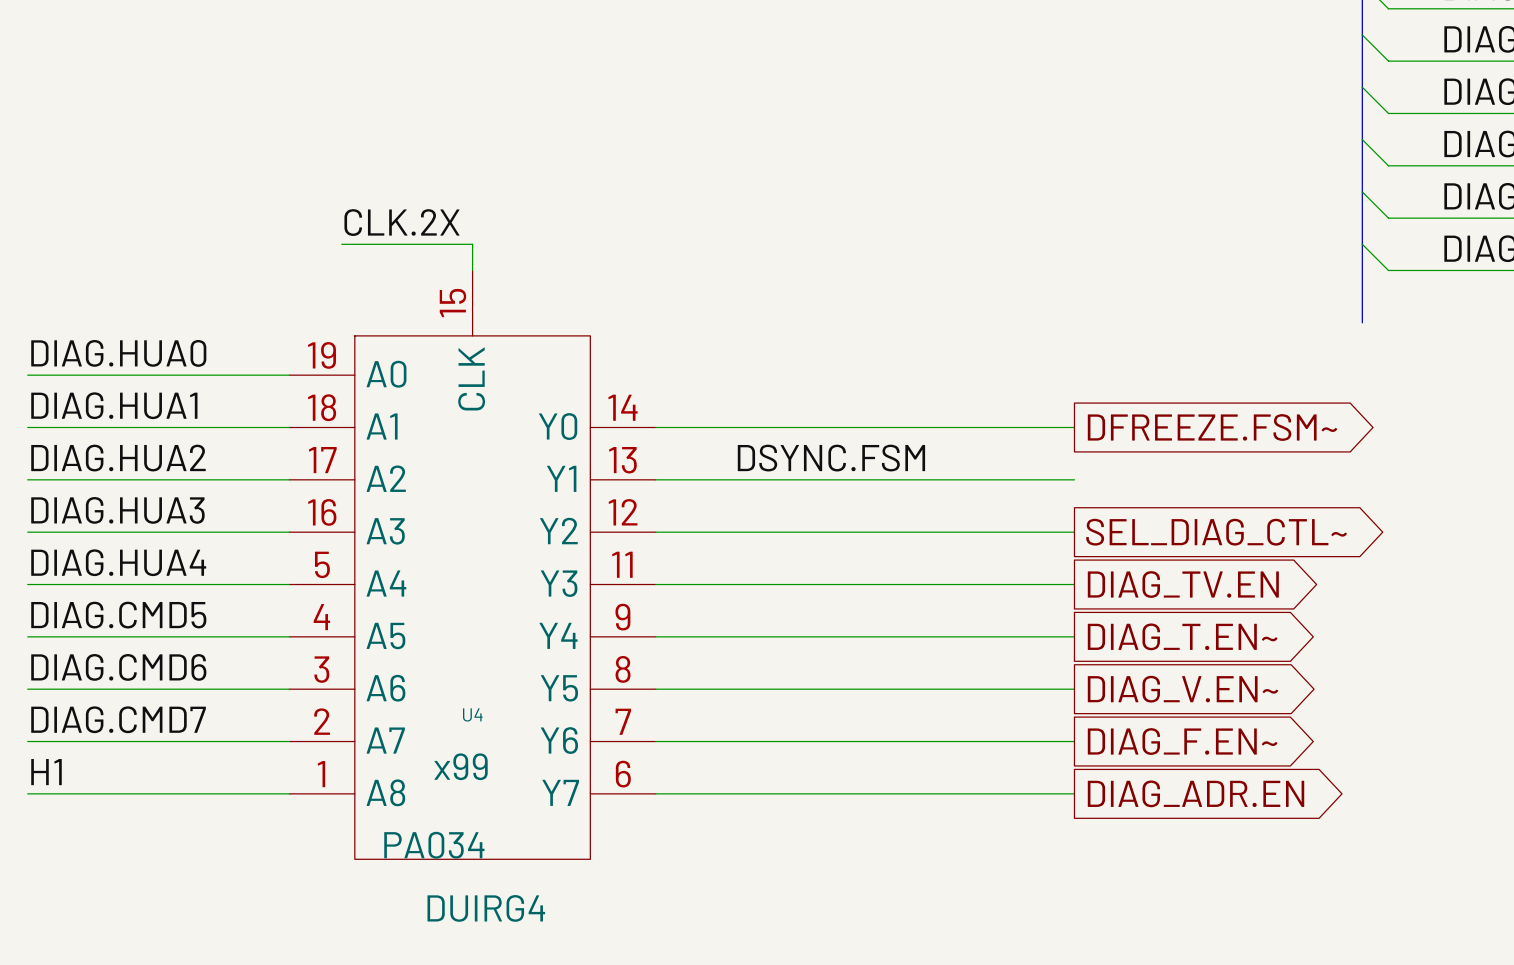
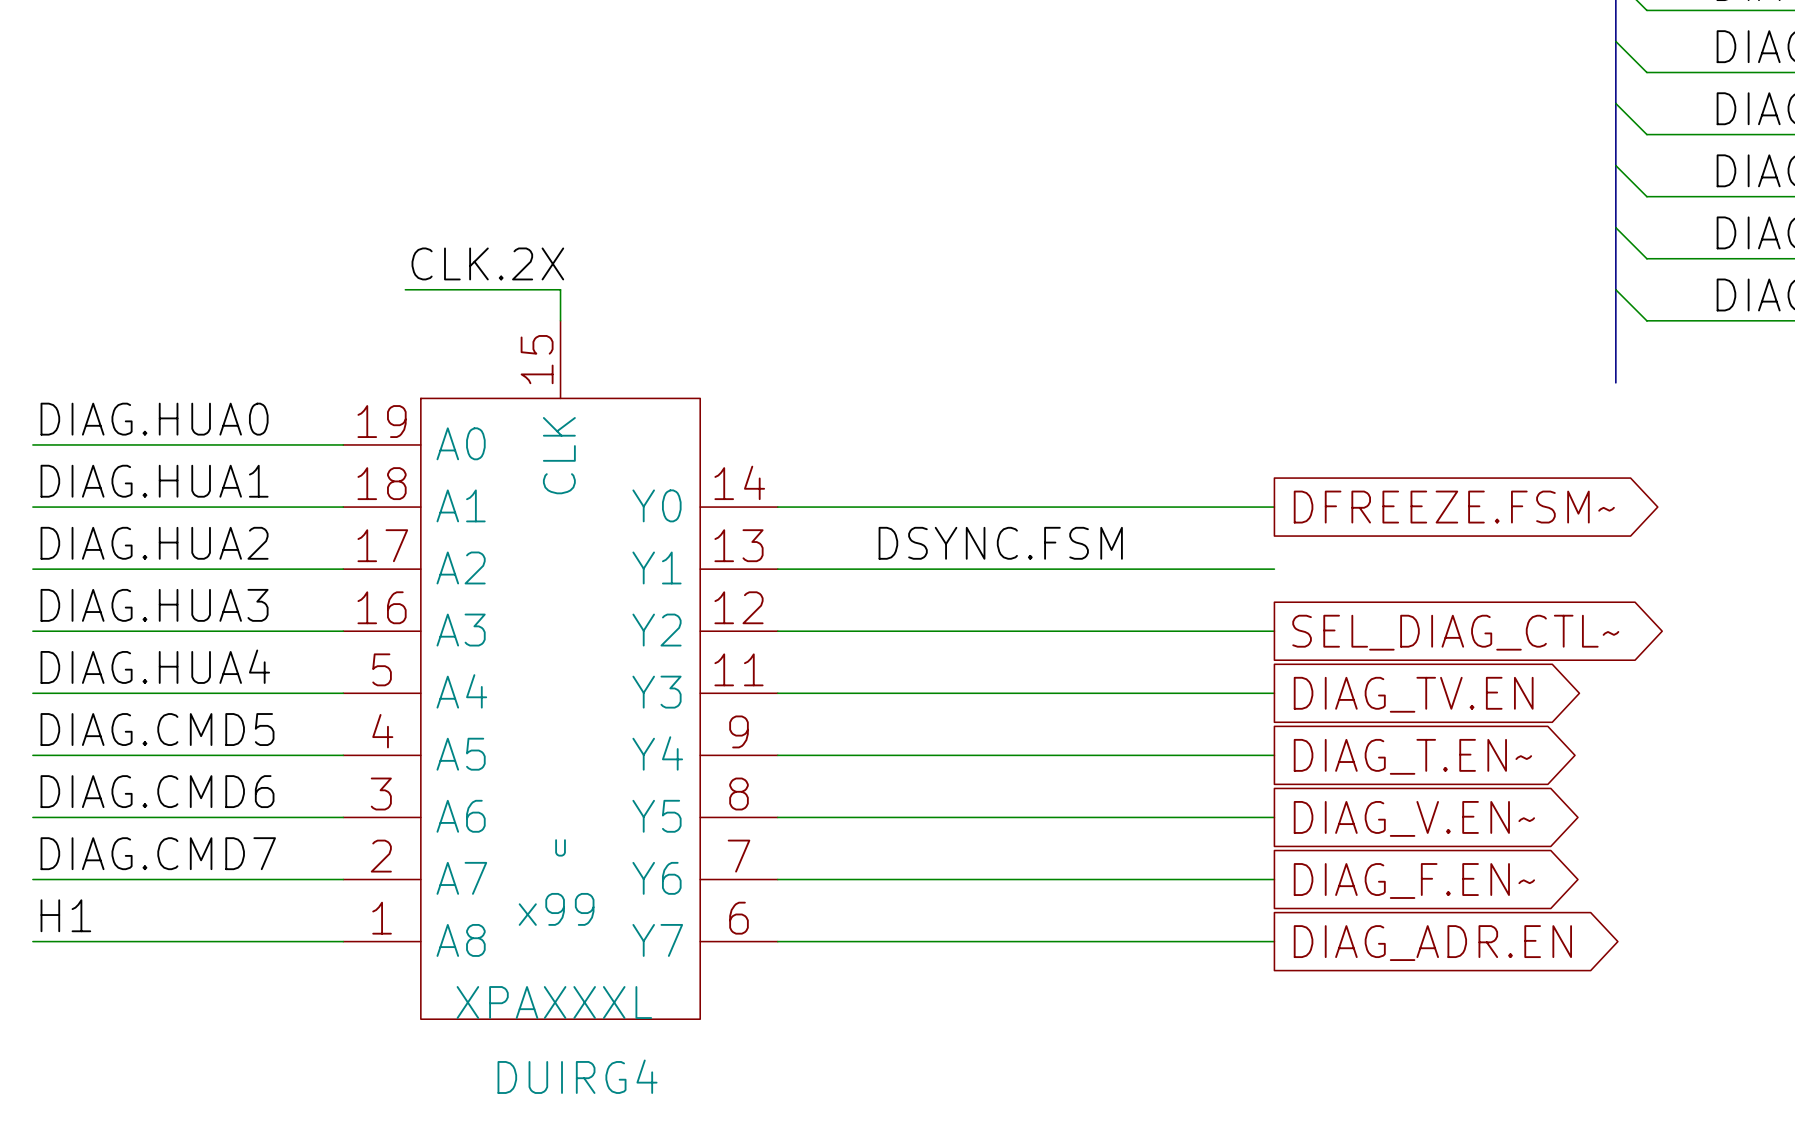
U4 name: U4 (472, 714) -> U (560, 847)
U4 value: PA034 (434, 845) -> XPAXXXL (554, 1002)

